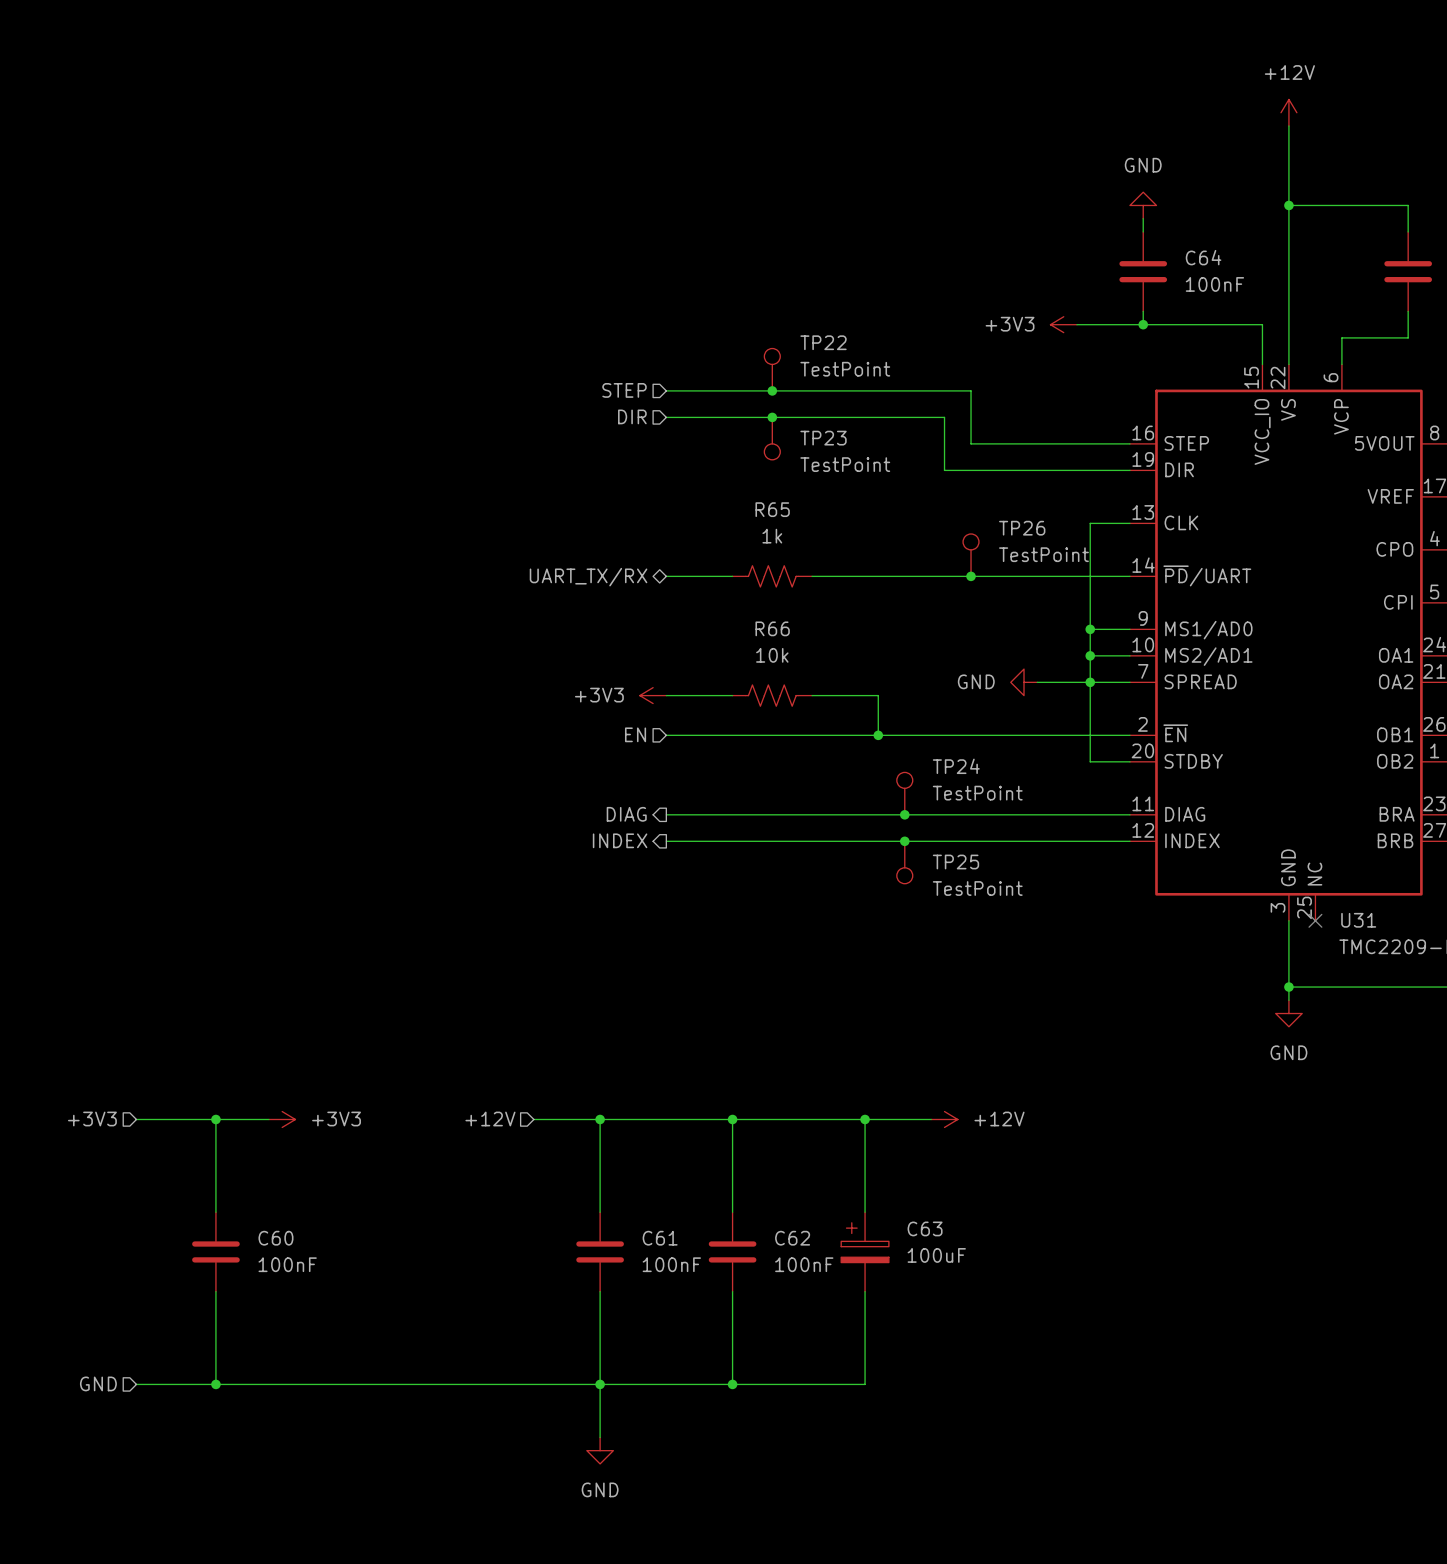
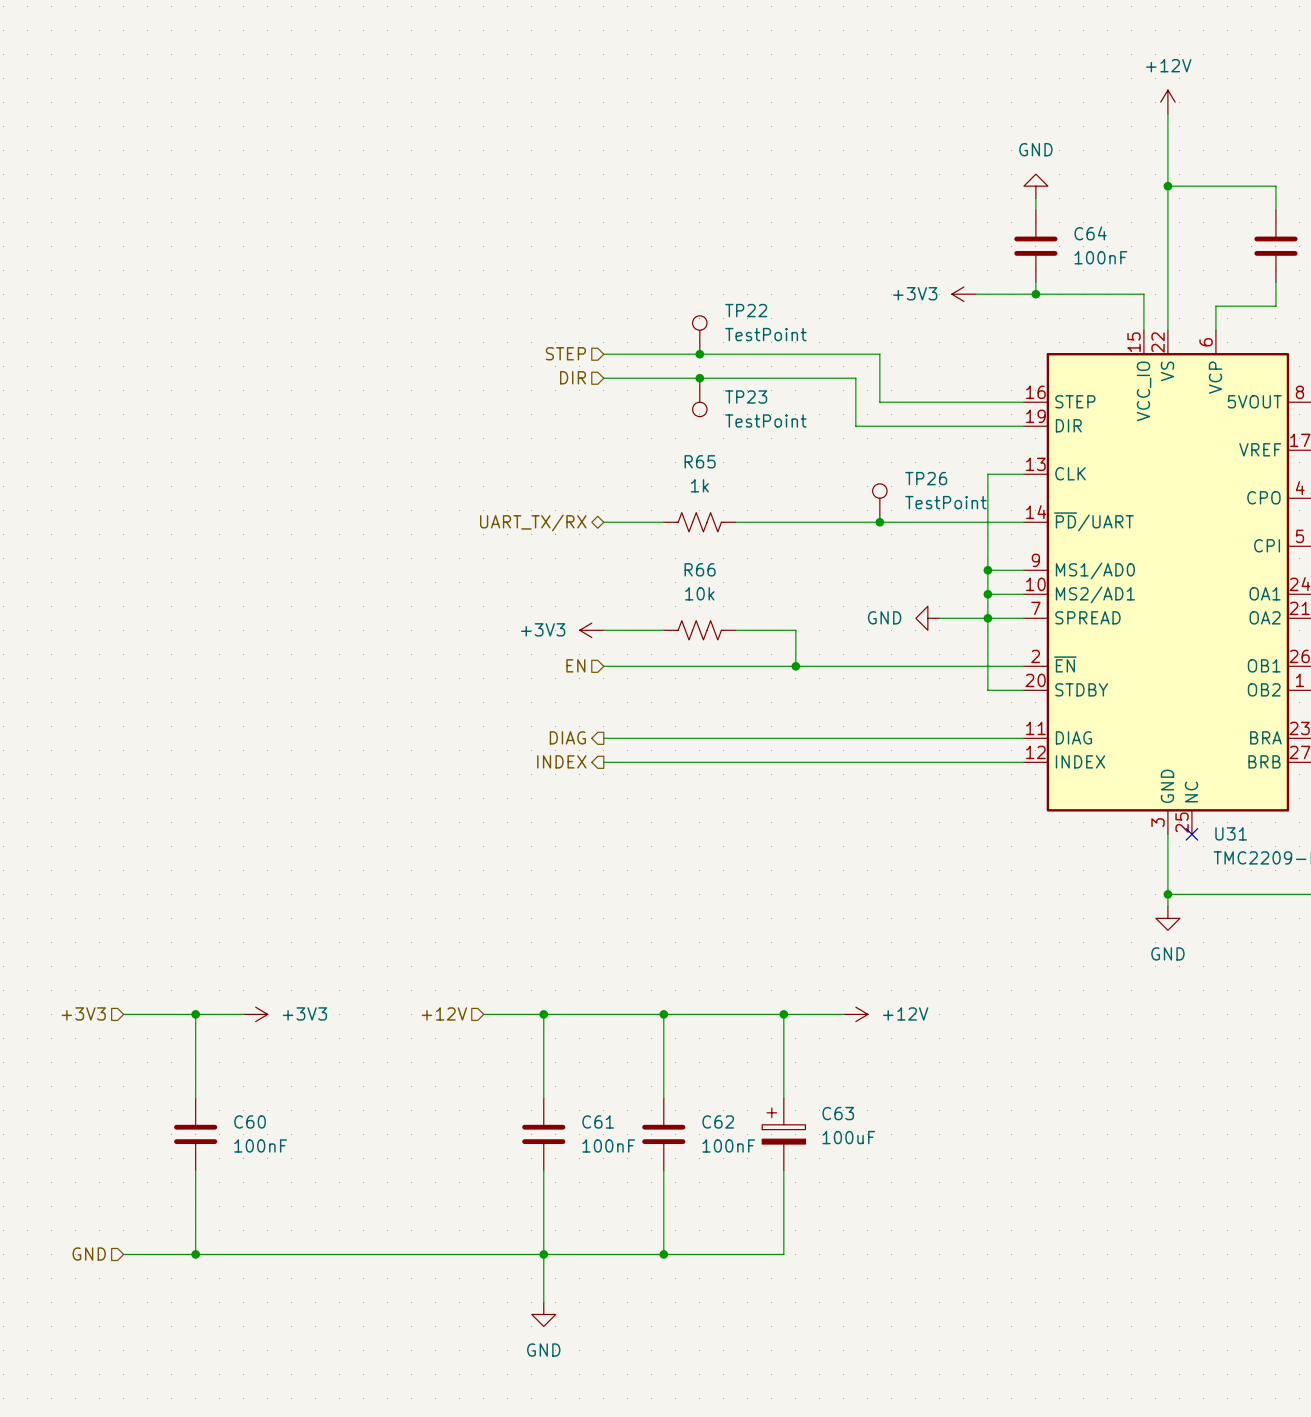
TP24: TestPoint (904, 793) -> none
junction: (904, 814) -> none
junction: (904, 841) -> none
TP25: TestPoint (904, 862) -> none

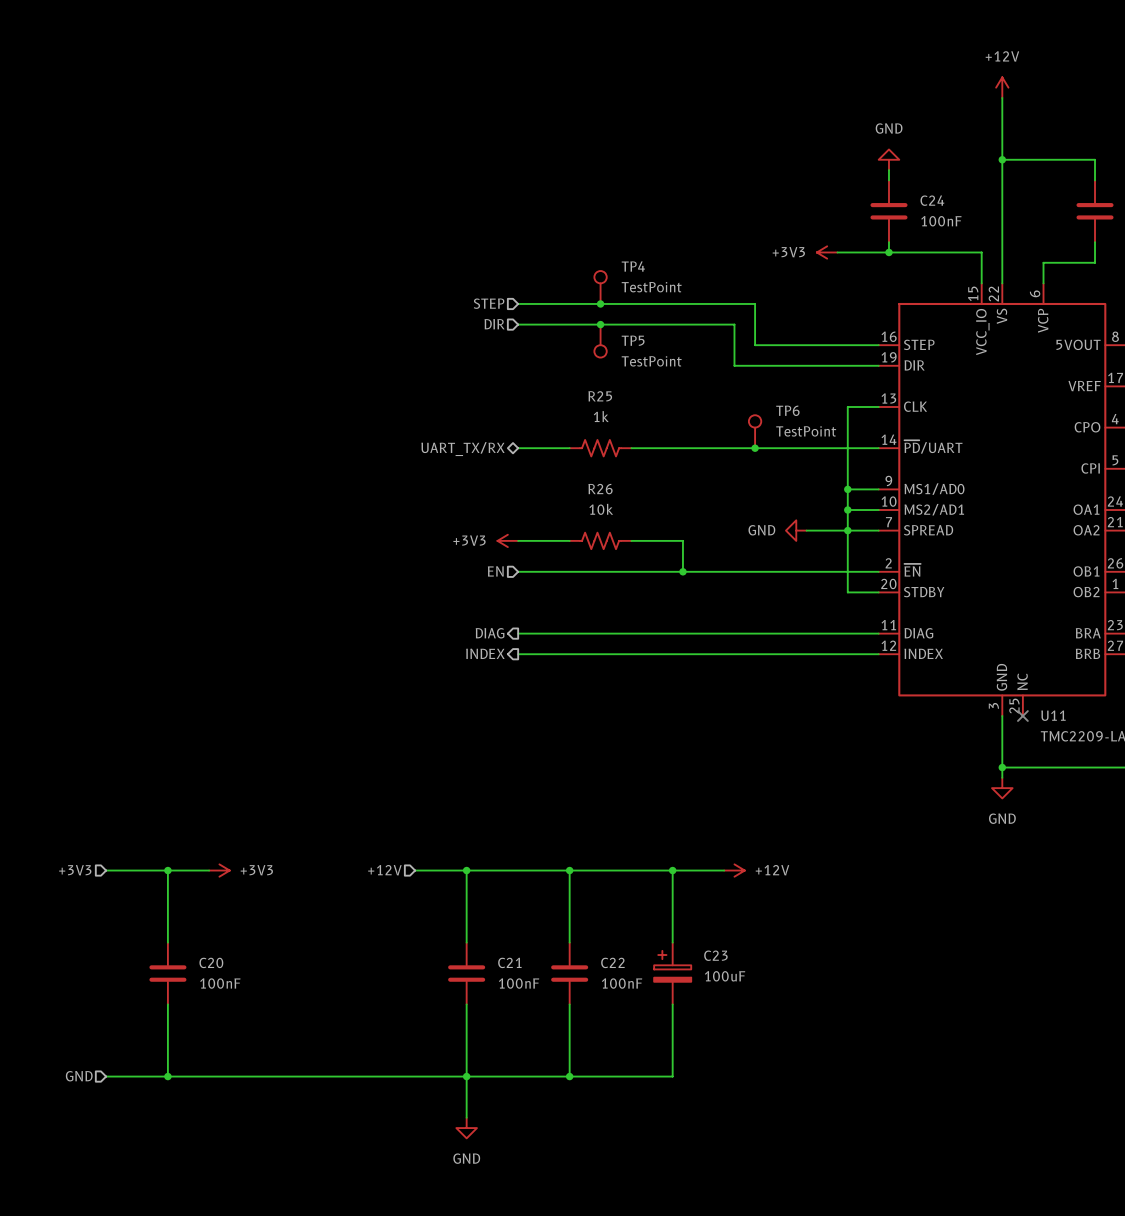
C64 name: C64 (1090, 233) -> C24 (932, 200)
TP22 name: TP22 (746, 310) -> TP4 (633, 266)
TP23 name: TP23 (746, 396) -> TP5 (633, 340)
R65 name: R65 (700, 461) -> R25 (600, 396)
TP26 name: TP26 (926, 478) -> TP6 (787, 410)
R66 name: R66 (700, 569) -> R26 (600, 489)
U31 name: U31 (1231, 833) -> U11 (1053, 715)
C63 name: C63 (838, 1113) -> C23 (715, 955)
C60 name: C60 (250, 1121) -> C20 (211, 962)
C61 name: C61 (598, 1121) -> C21 (509, 962)
C62 name: C62 (718, 1121) -> C22 (612, 962)

